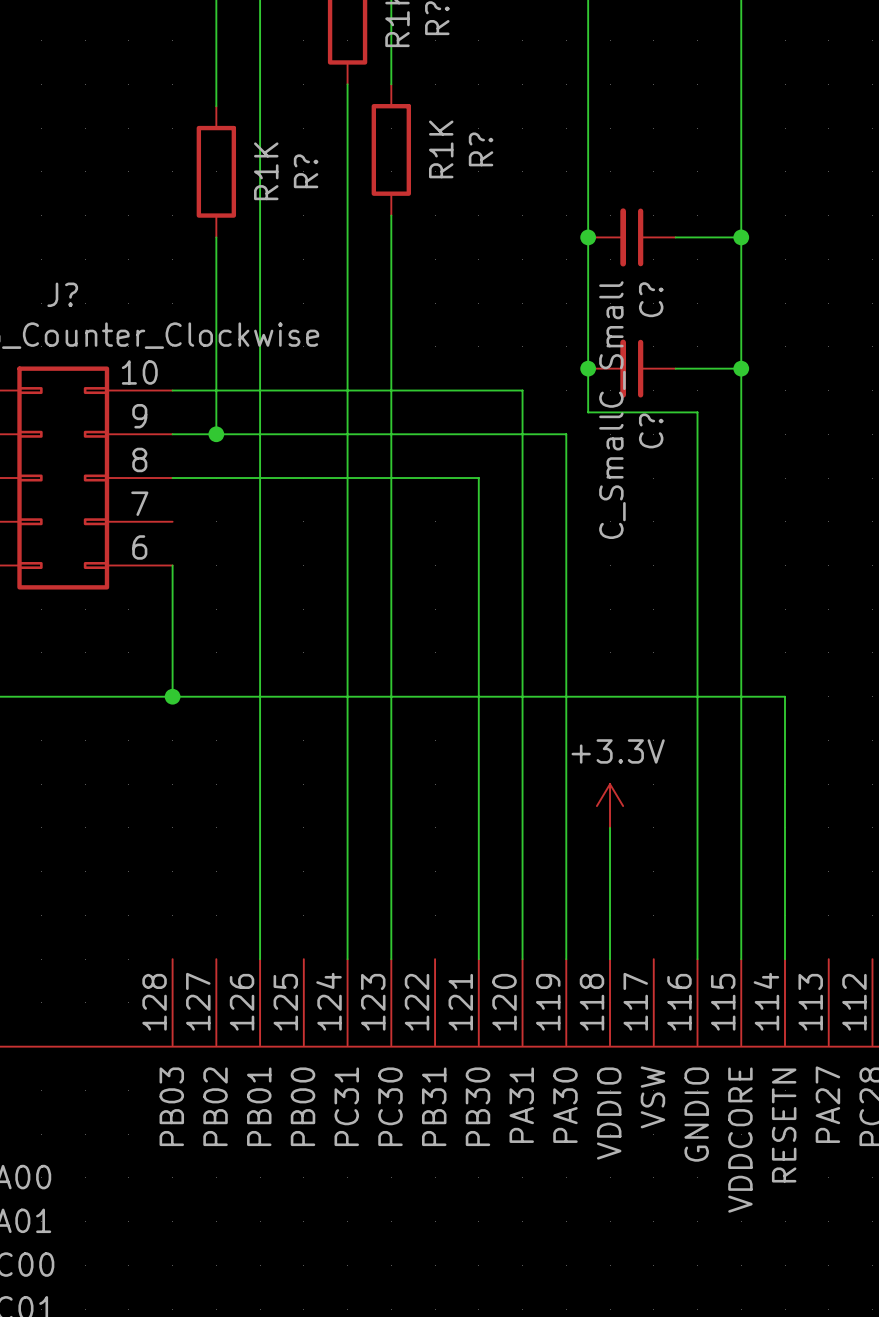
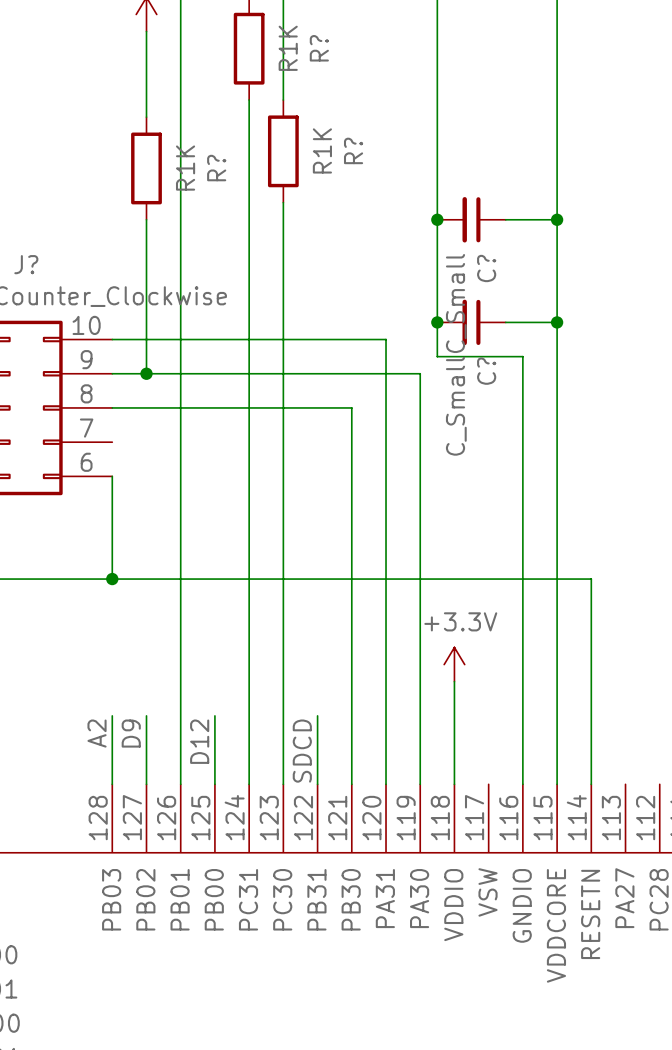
wire: none -> (112, 715) (112, 784)
wire: none -> (146, 715) (146, 784)
wire: none -> (214, 715) (214, 784)
wire: none -> (317, 715) (317, 784)
label: none -> A2 (97, 733)
label: none -> D9 (131, 733)
label: none -> D12 (199, 741)
label: none -> SDCD (302, 751)

